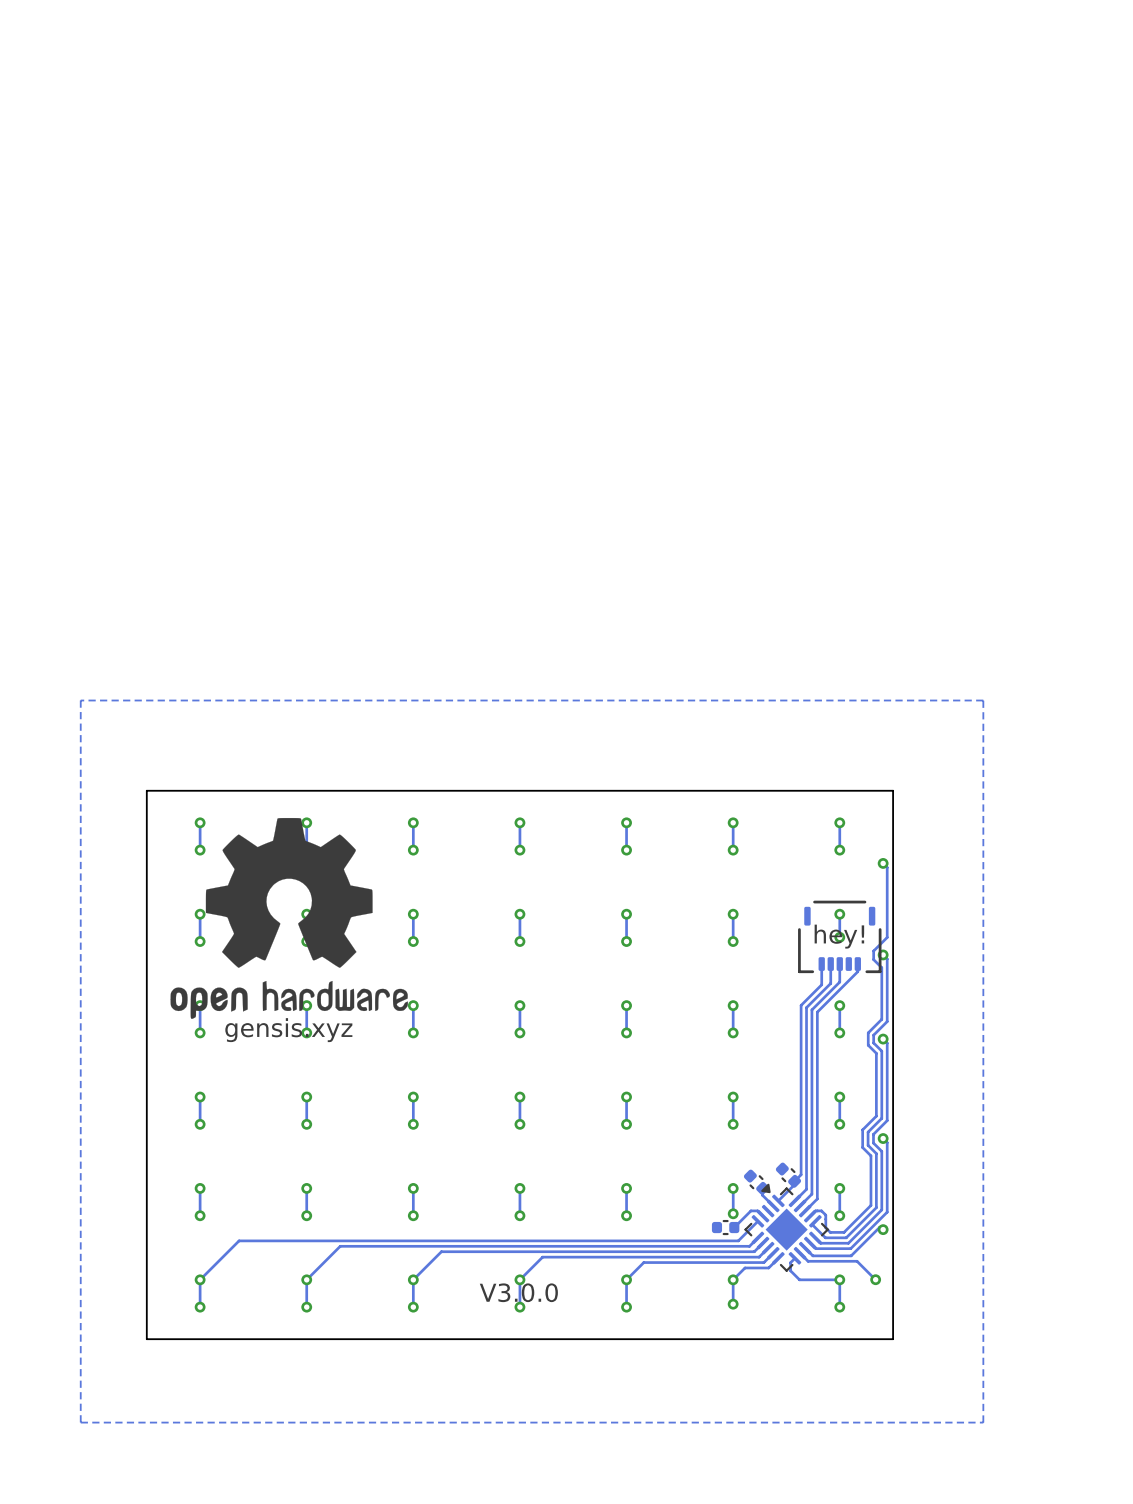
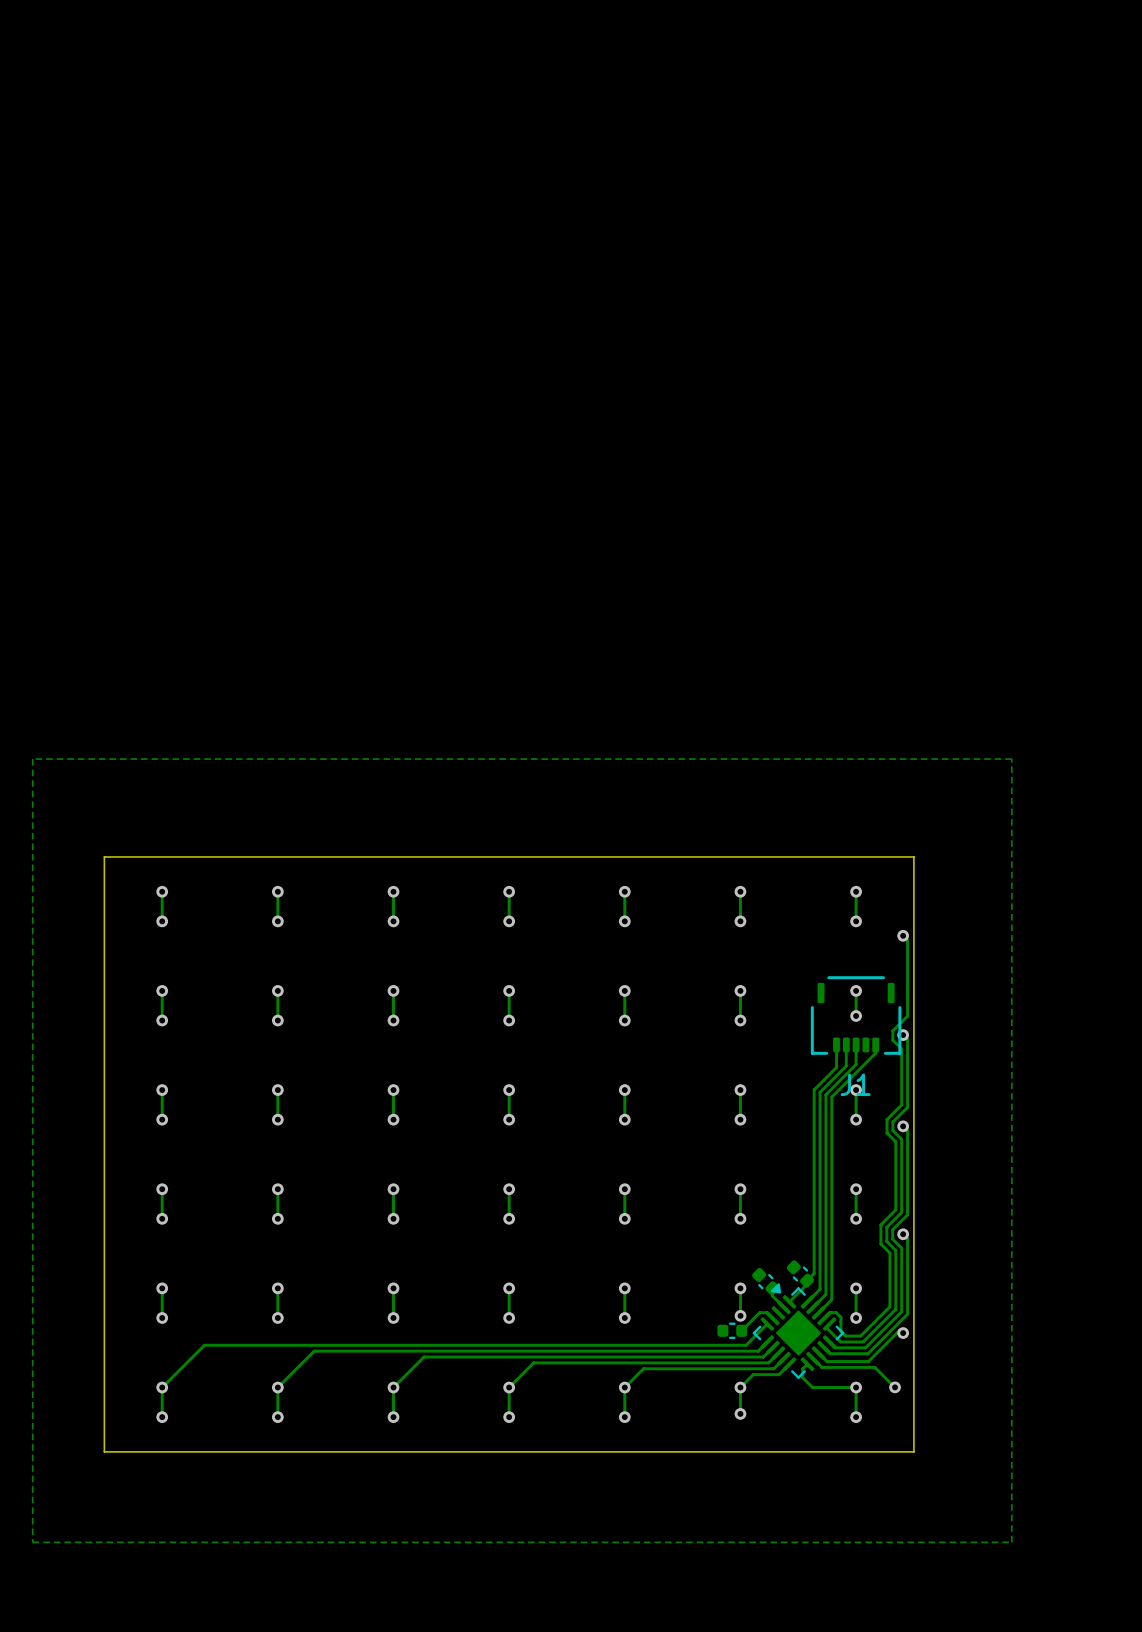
drawing: [170, 817, 408, 1019] -> none
text: hey! (839, 936) -> none
J1 name: none -> J1 (855, 1084)
text: gensis.xyz (288, 1030) -> none
text: V3.0.0 (518, 1292) -> none

